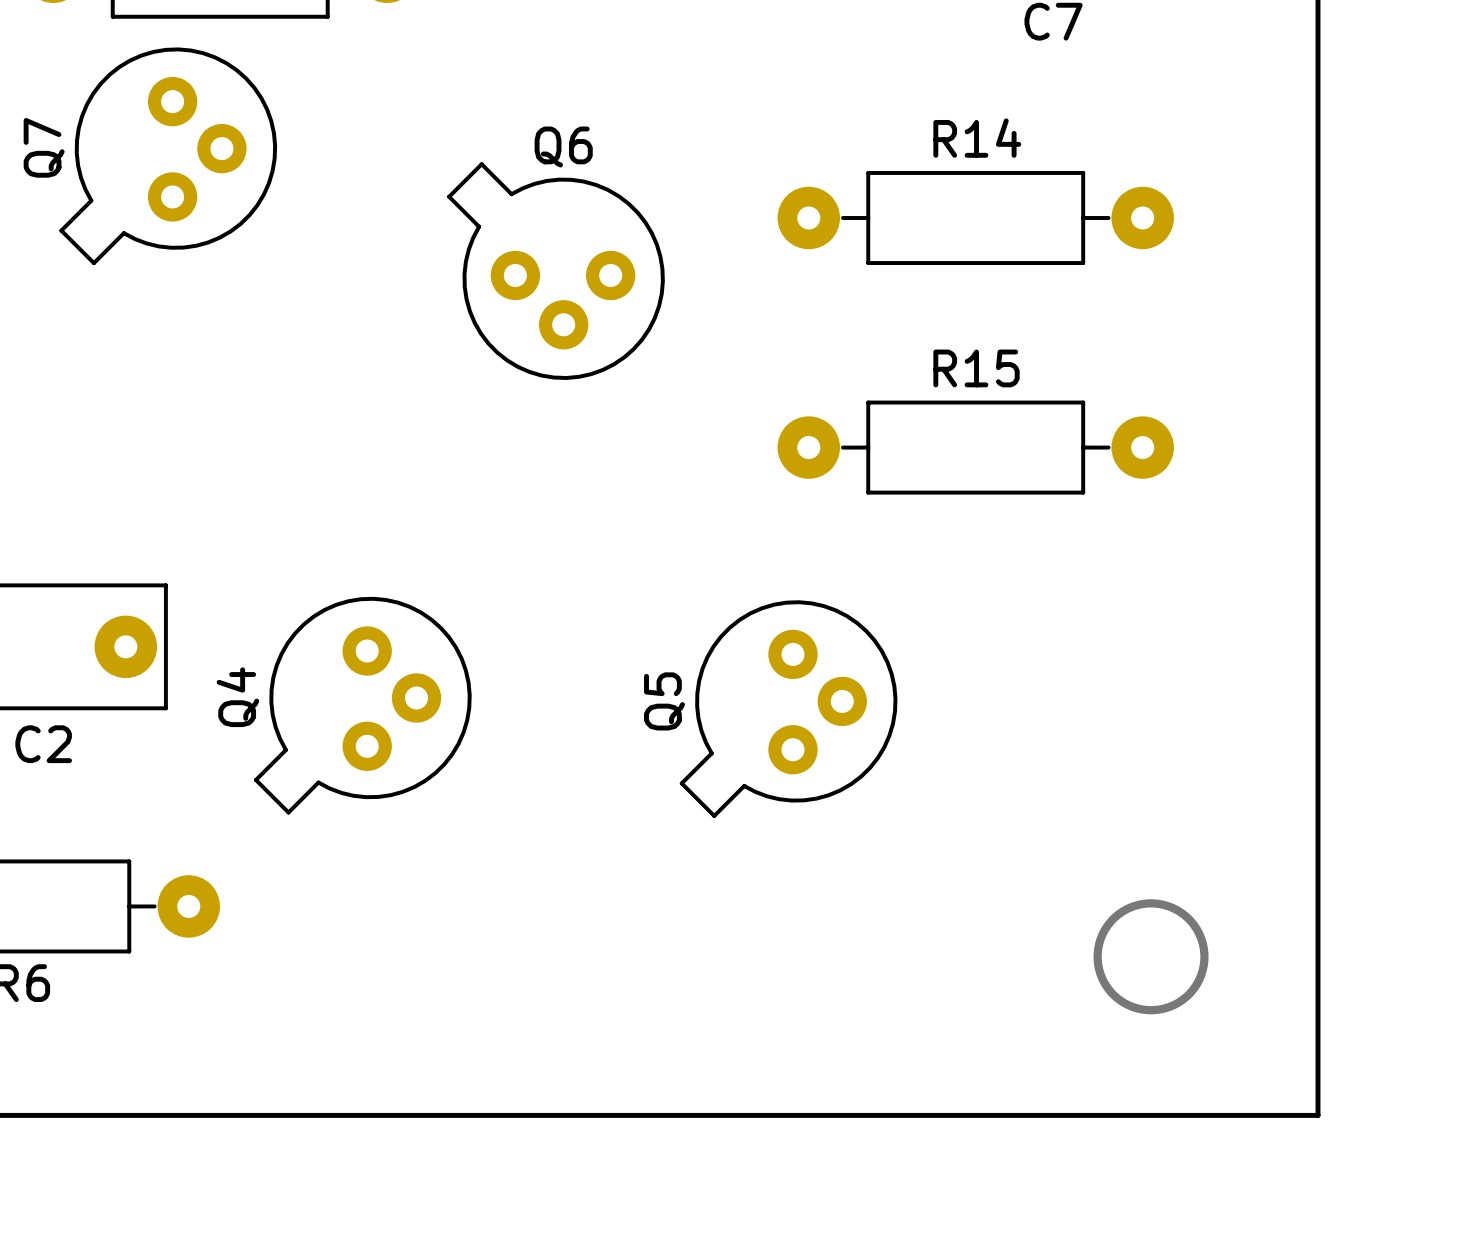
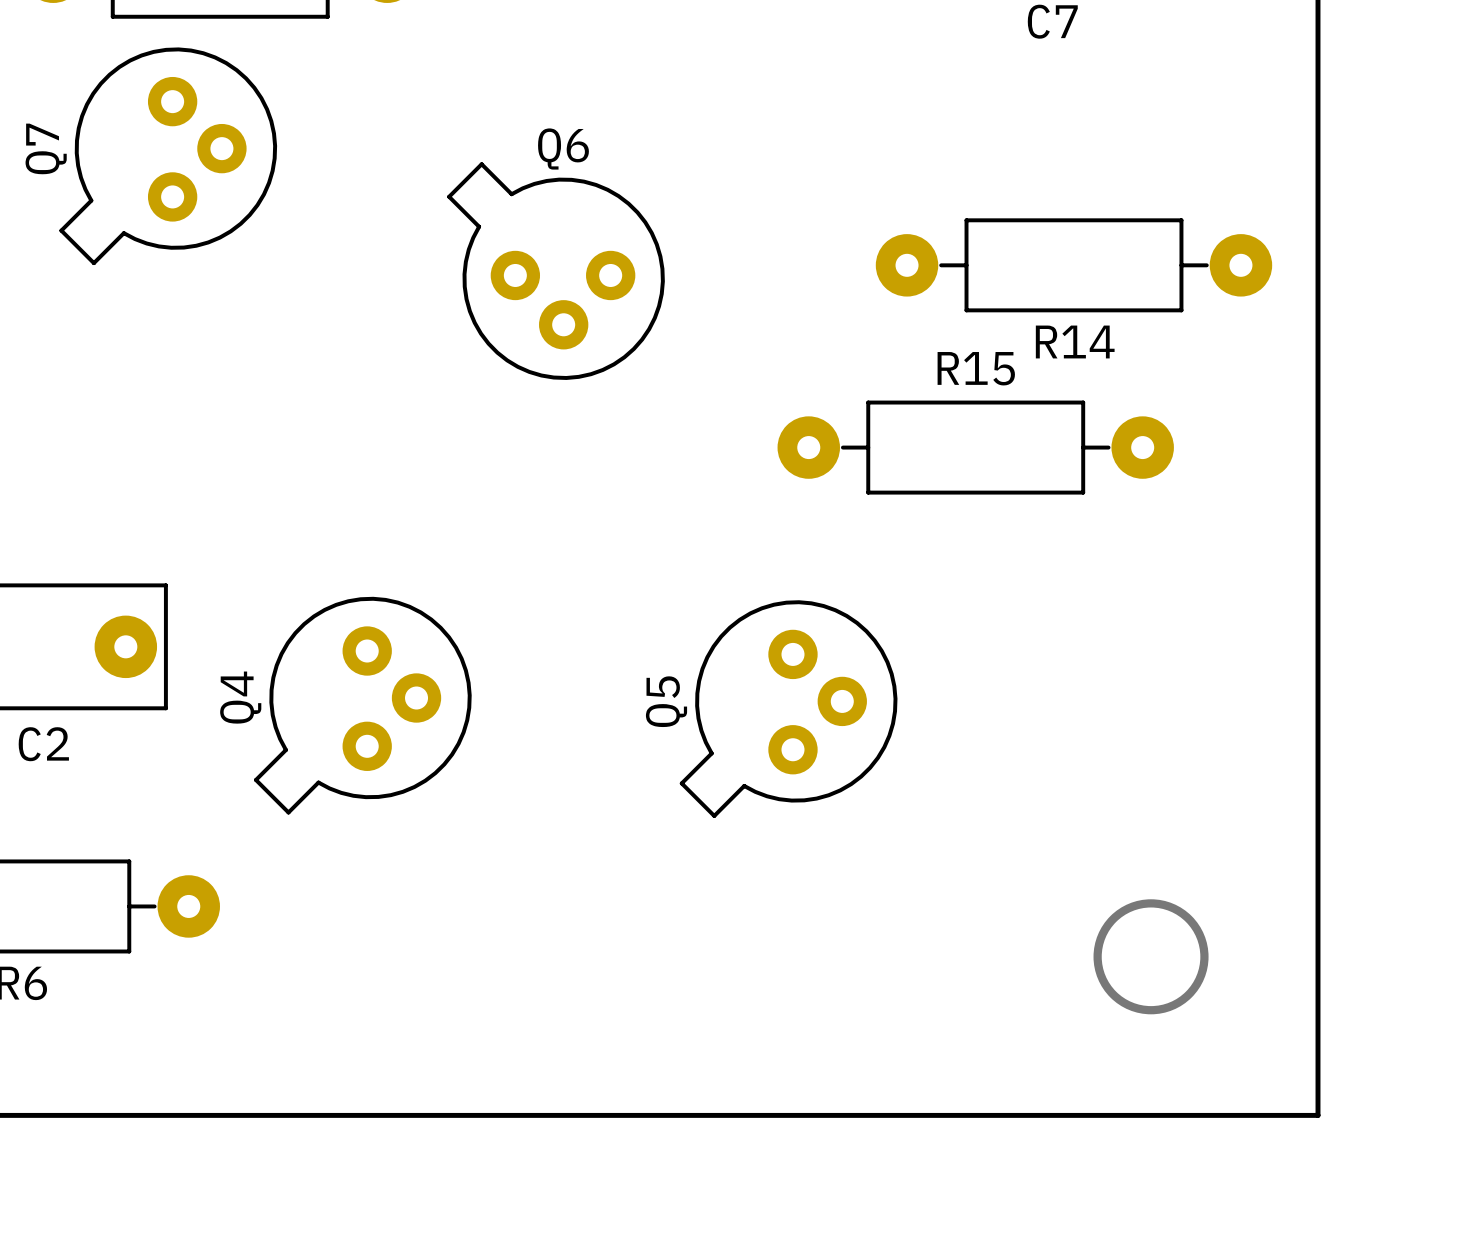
R14 name position: R14 (977, 138) -> R14 (1075, 341)
R14 position: (975, 217) -> (1073, 265)

